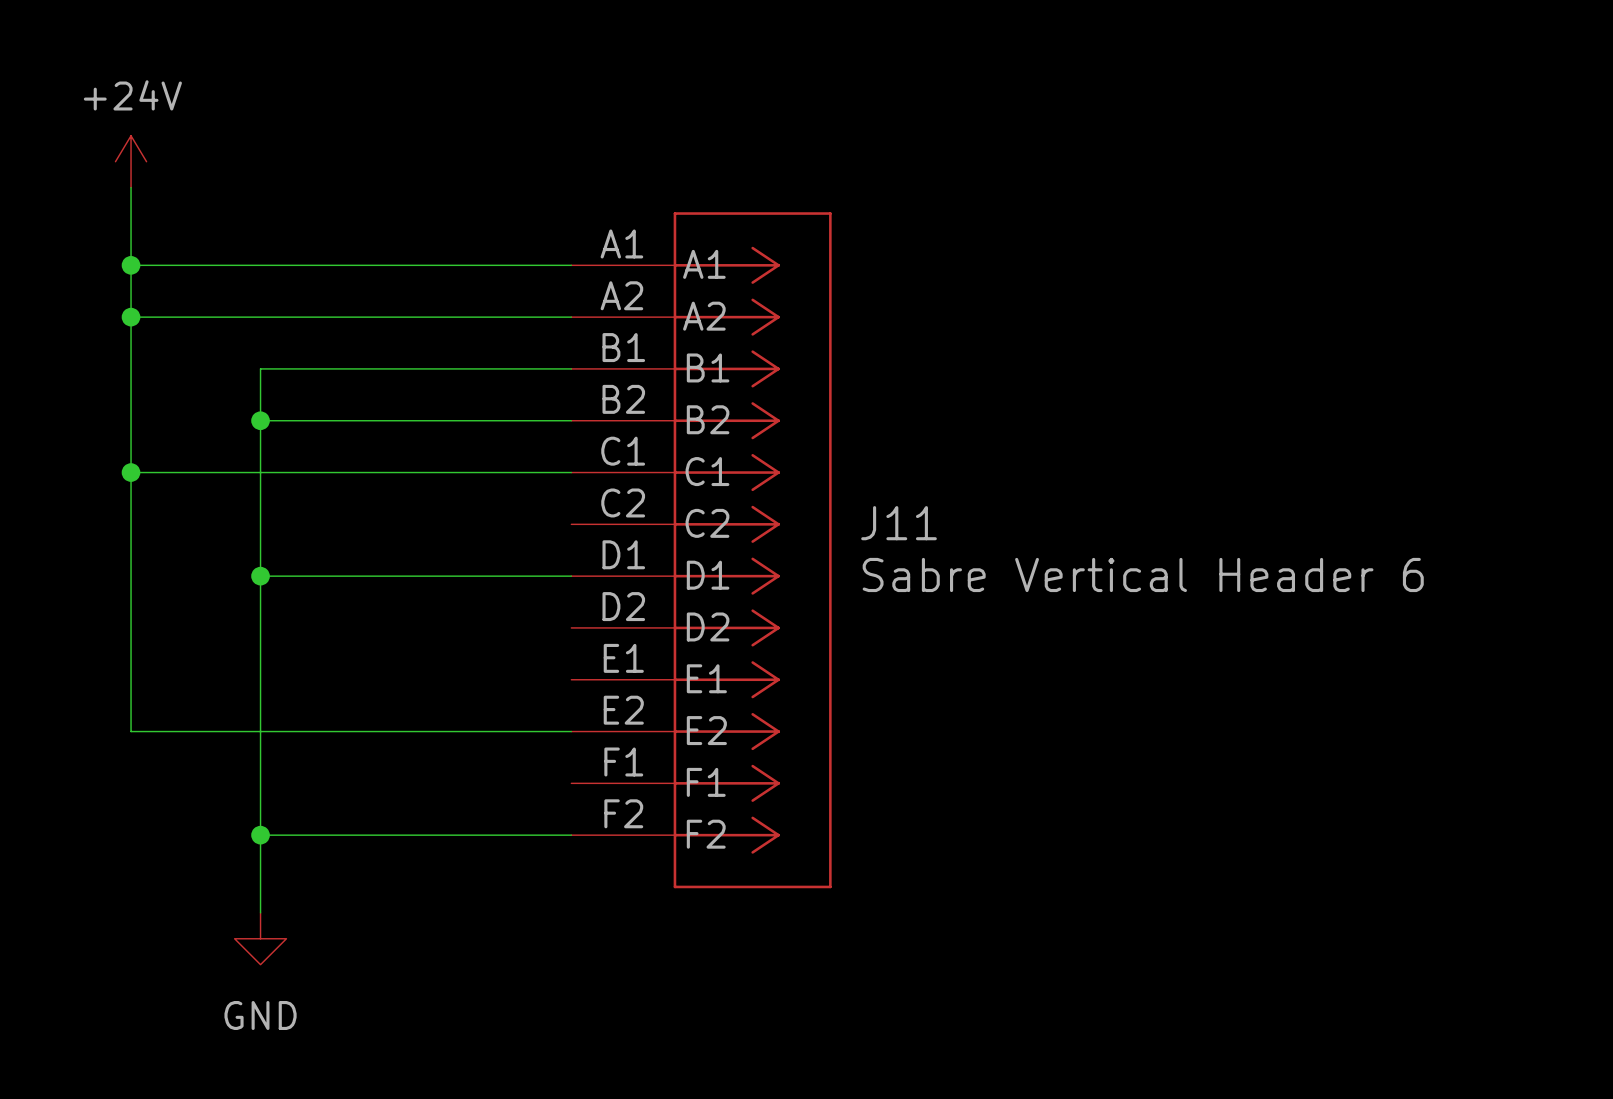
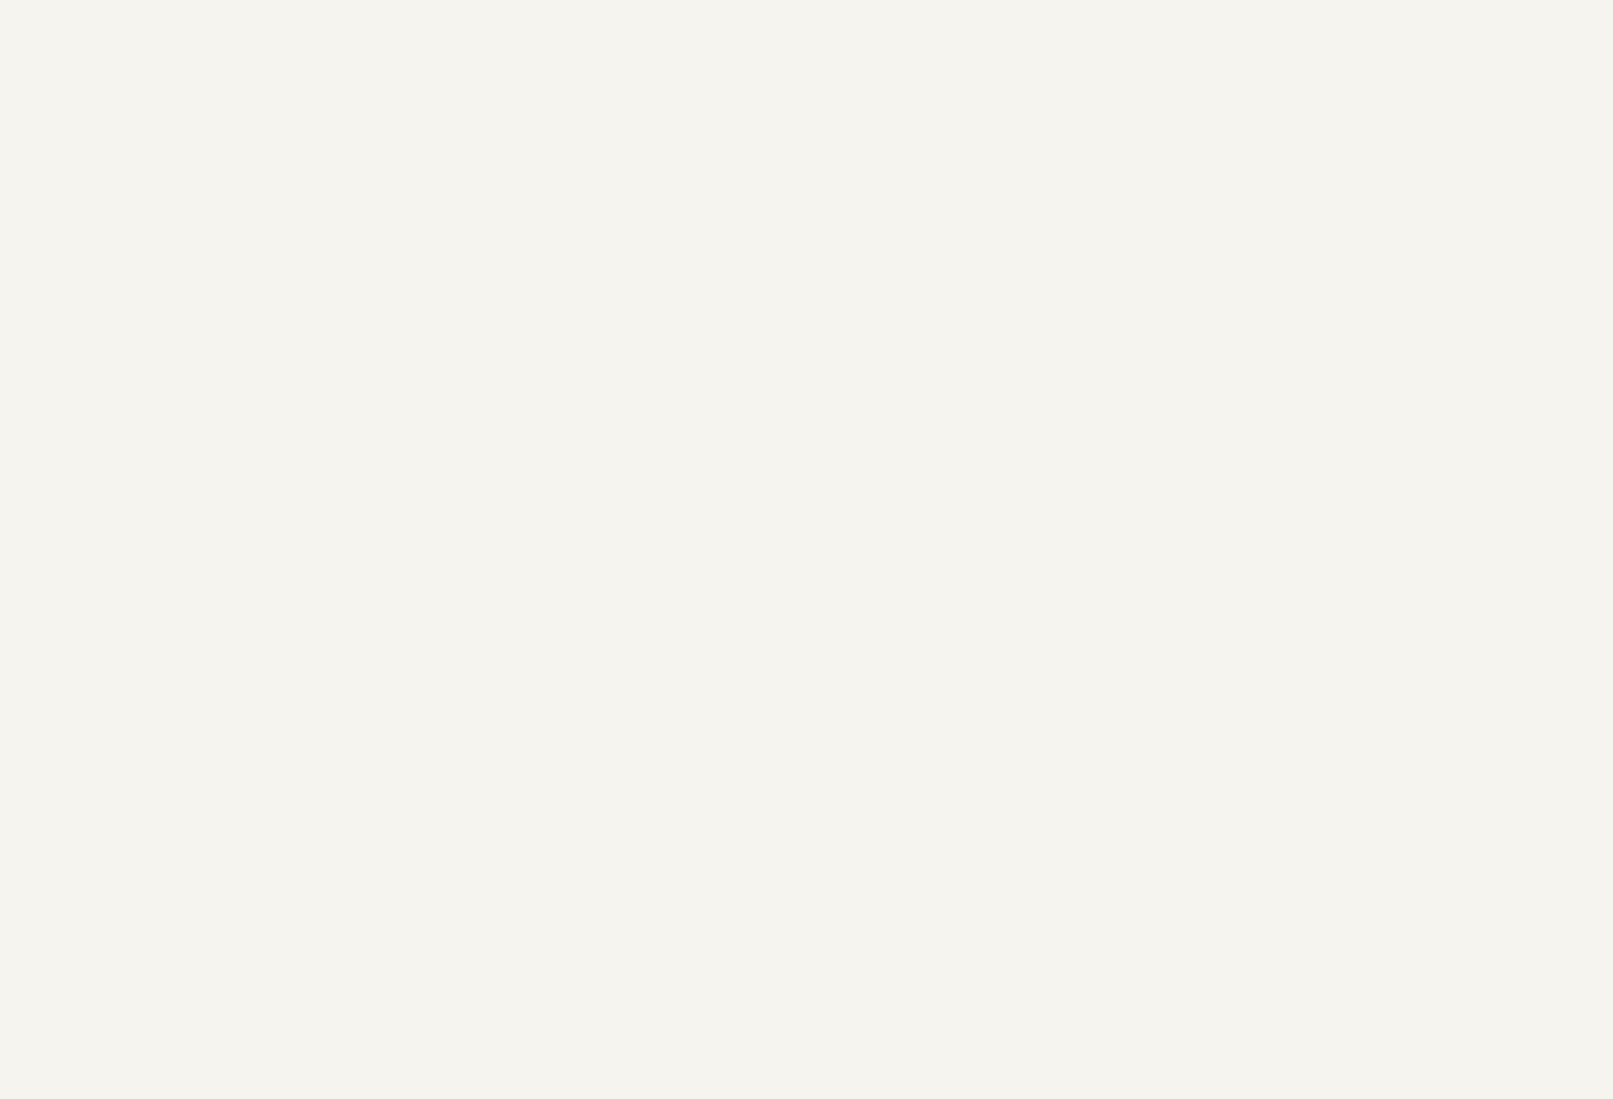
power symbol: +24V (131, 161) -> none
wire: (131, 187) (131, 731) (571, 731) -> none
wire: (131, 265) (571, 265) -> none
junction: (131, 265) -> none
wire: (131, 317) (571, 317) -> none
junction: (131, 317) -> none
wire: (571, 368) (260, 368) (260, 912) -> none
wire: (260, 420) (571, 420) -> none
junction: (260, 420) -> none
wire: (131, 472) (571, 472) -> none
junction: (131, 472) -> none
J11: Sabre Vertical Header 6 (701, 550) -> none
wire: (260, 576) (571, 576) -> none
junction: (260, 576) -> none
wire: (260, 835) (571, 835) -> none
junction: (260, 835) -> none
power symbol: GND (260, 938) -> none

